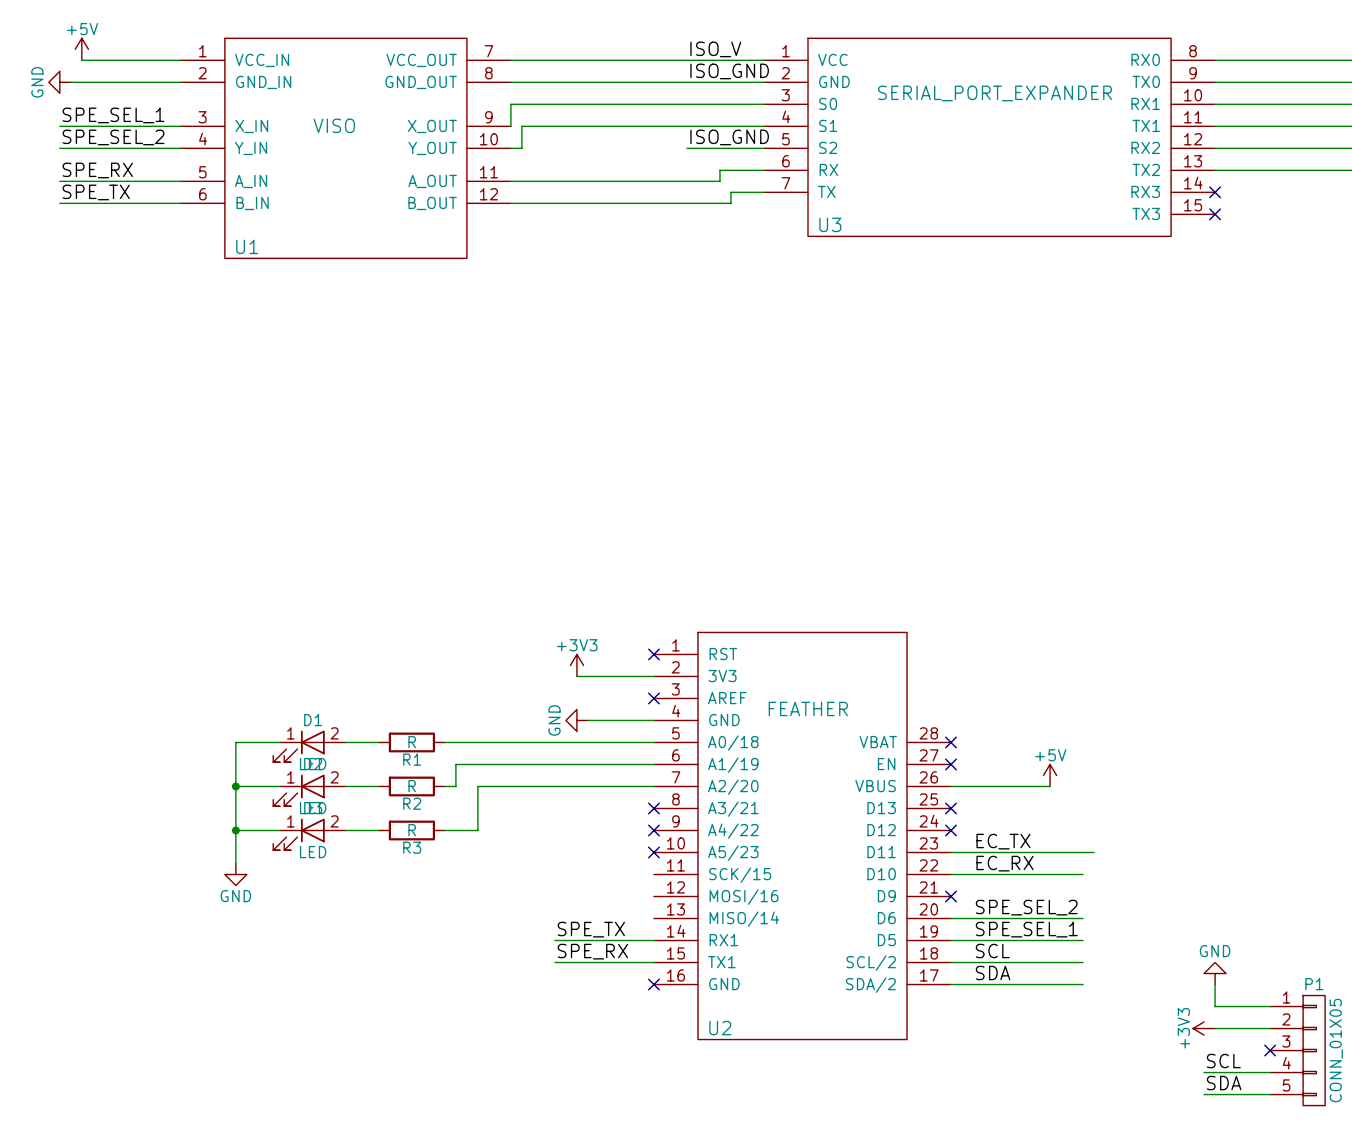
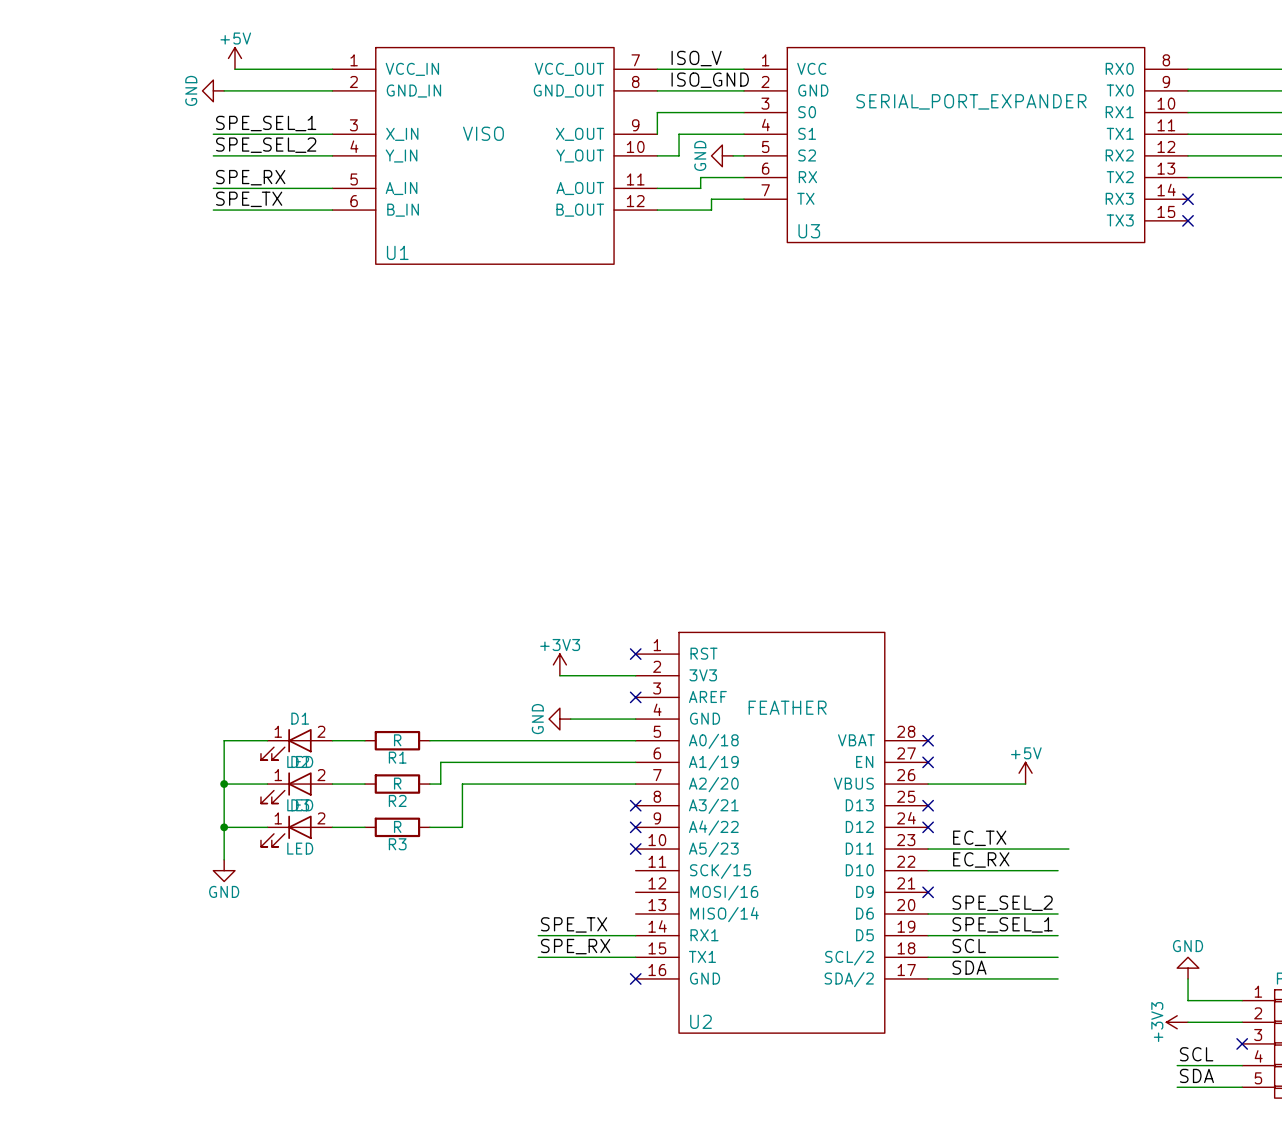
power symbol position: +5V (81, 49) -> +5V (234, 58)
wire: (81, 60) (180, 60) -> (234, 69) (332, 69)
wire: (510, 60) (675, 60) -> none
power symbol position: GND (59, 82) -> GND (213, 90)
wire: (70, 82) (180, 82) -> (224, 90) (332, 90)
wire: (510, 82) (675, 82) -> none
wire: (675, 104) (510, 104) (510, 126) -> (657, 112) (657, 134)
label position: SPE_SEL_1 (113, 115) -> SPE_SEL_1 (266, 123)
wire: (59, 126) (180, 126) -> (213, 134) (332, 134)
wire: (697, 126) (521, 126) (521, 148) (510, 148) -> none
label position: SPE_SEL_2 (113, 137) -> SPE_SEL_2 (266, 145)
label: ISO_GND (729, 137) -> none
wire: (59, 148) (180, 148) -> (213, 155) (332, 155)
U1 position: (345, 148) -> (494, 155)
wire: none -> (657, 155) (668, 155)
wire: (697, 148) (752, 148) -> (679, 155) (679, 134)
power symbol: none -> GND (722, 155)
label position: SPE_RX (97, 170) -> SPE_RX (250, 177)
wire: (59, 181) (180, 181) -> (213, 188) (332, 188)
wire: (510, 181) (675, 181) -> none
label position: SPE_TX (96, 192) -> SPE_TX (249, 199)
wire: (59, 203) (180, 203) -> (213, 210) (332, 210)
wire: (510, 203) (675, 203) -> none

